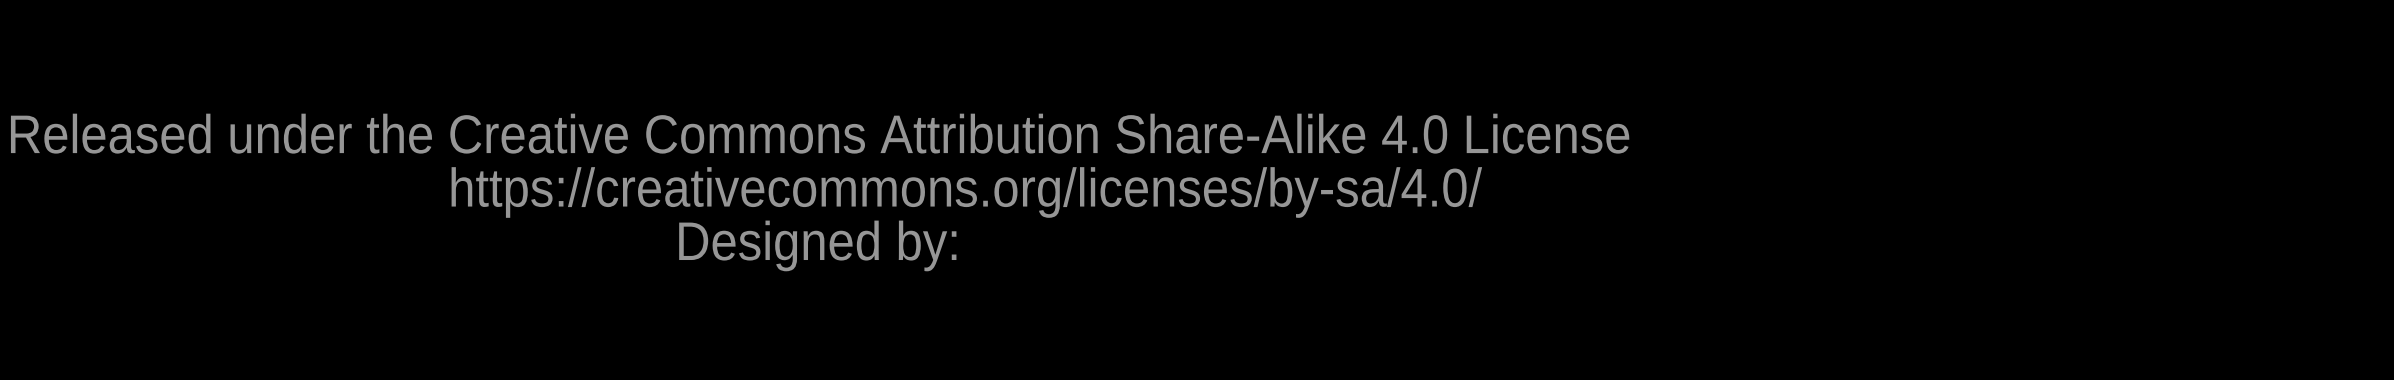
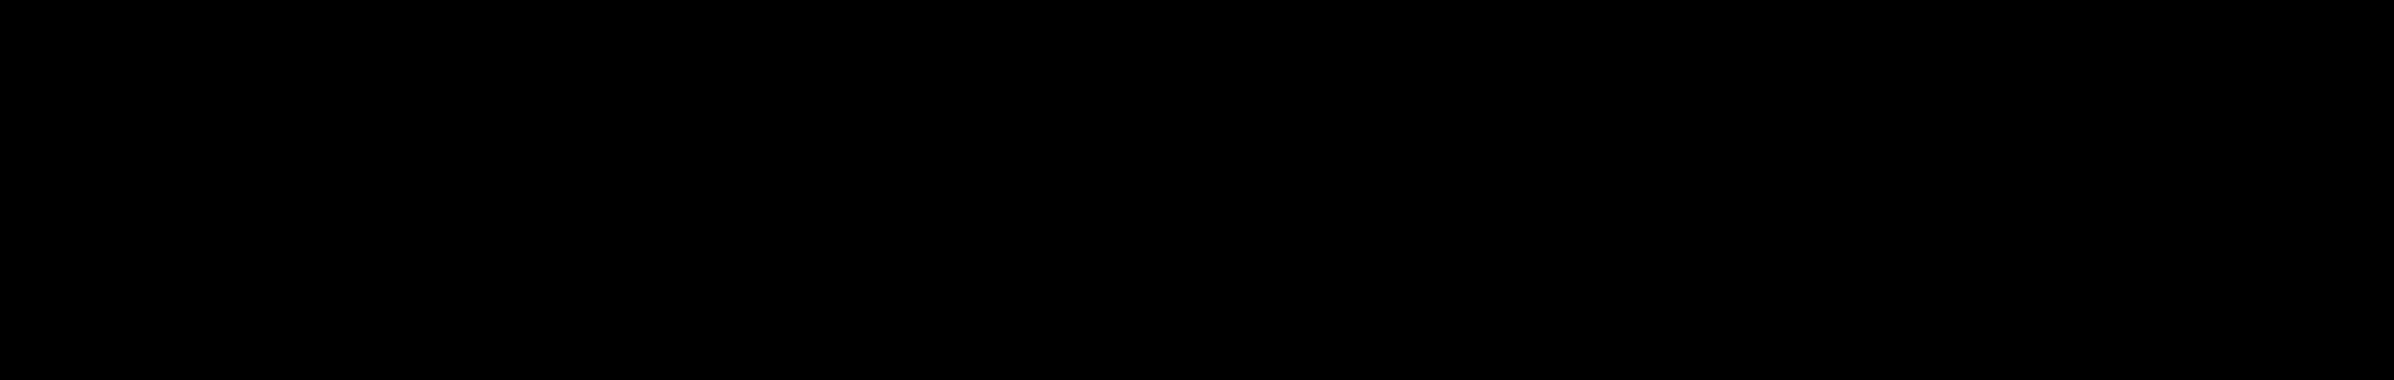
drawing: [10, 113, 1630, 272] -> none

